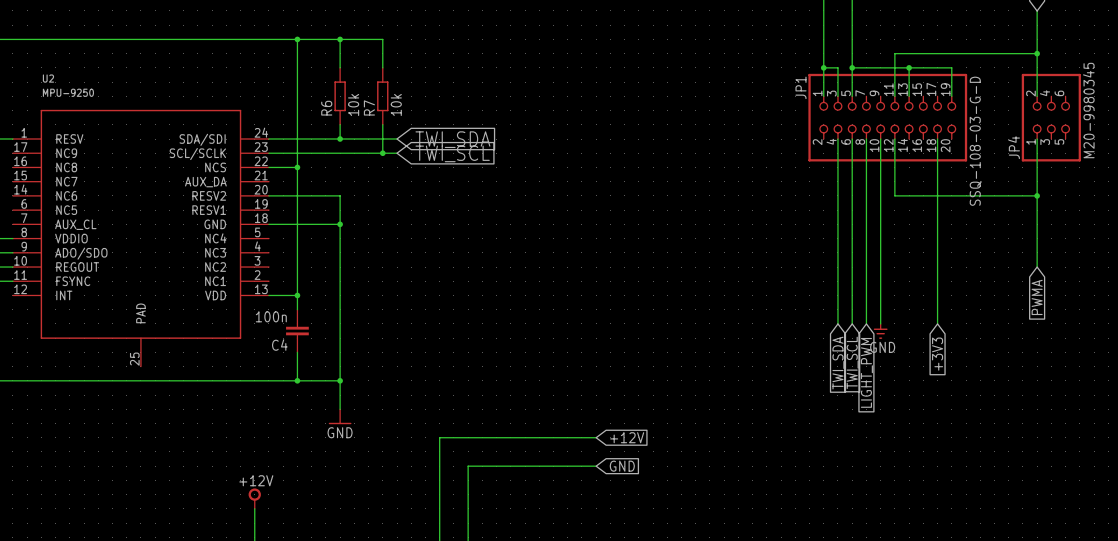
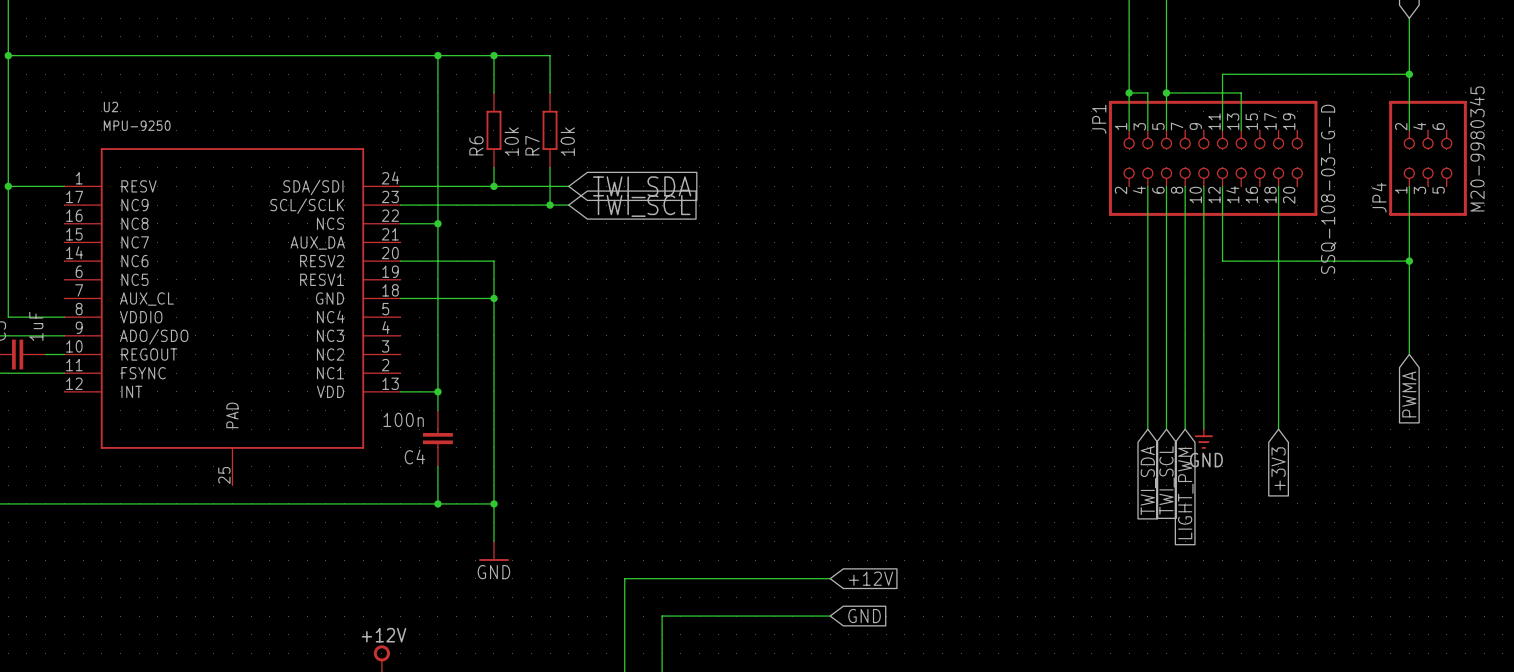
wire: (909, 67) (951, 67) (951, 96) -> none
junction: (909, 67) -> none

